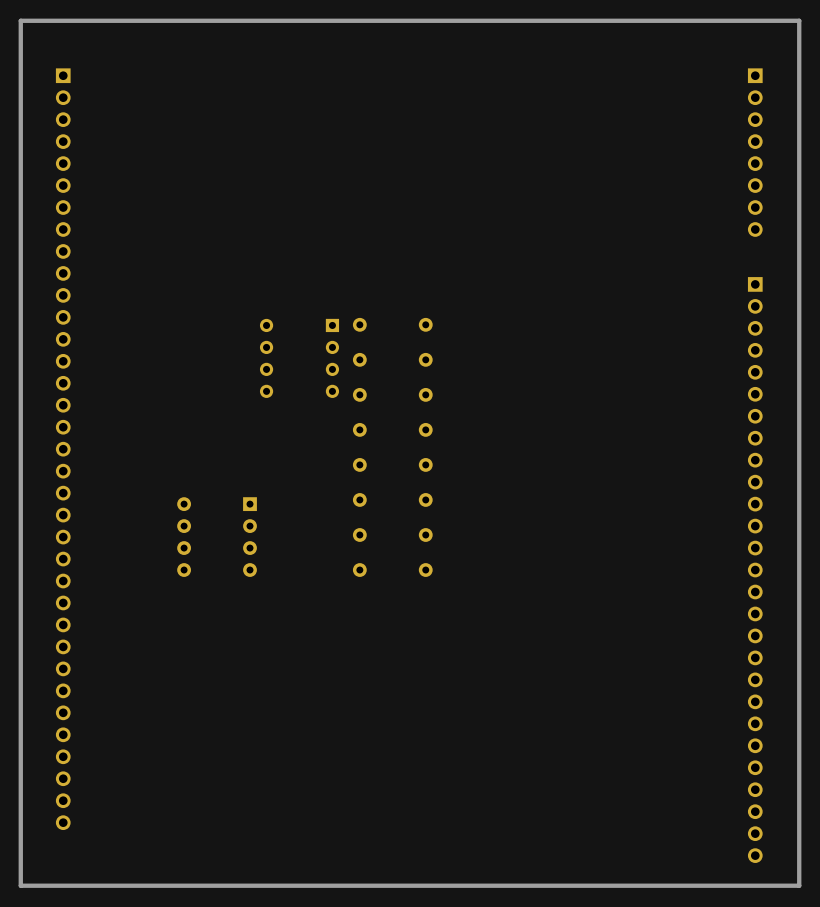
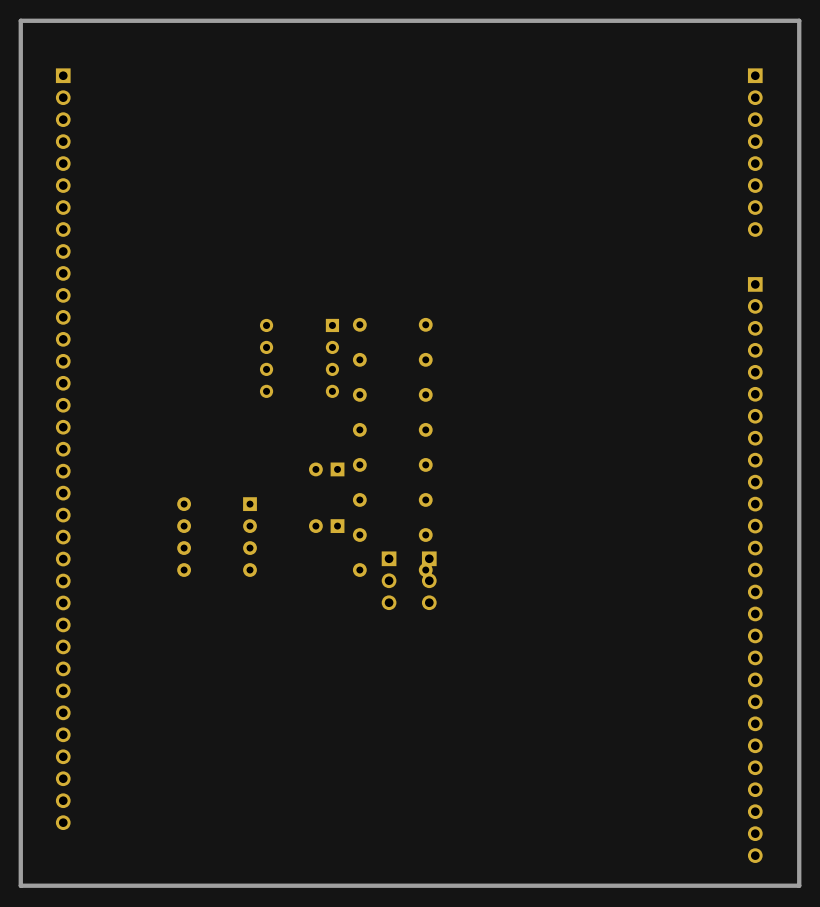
part: none -> (326, 469)
part: none -> (326, 526)
part: none -> (389, 580)
part: none -> (429, 580)

